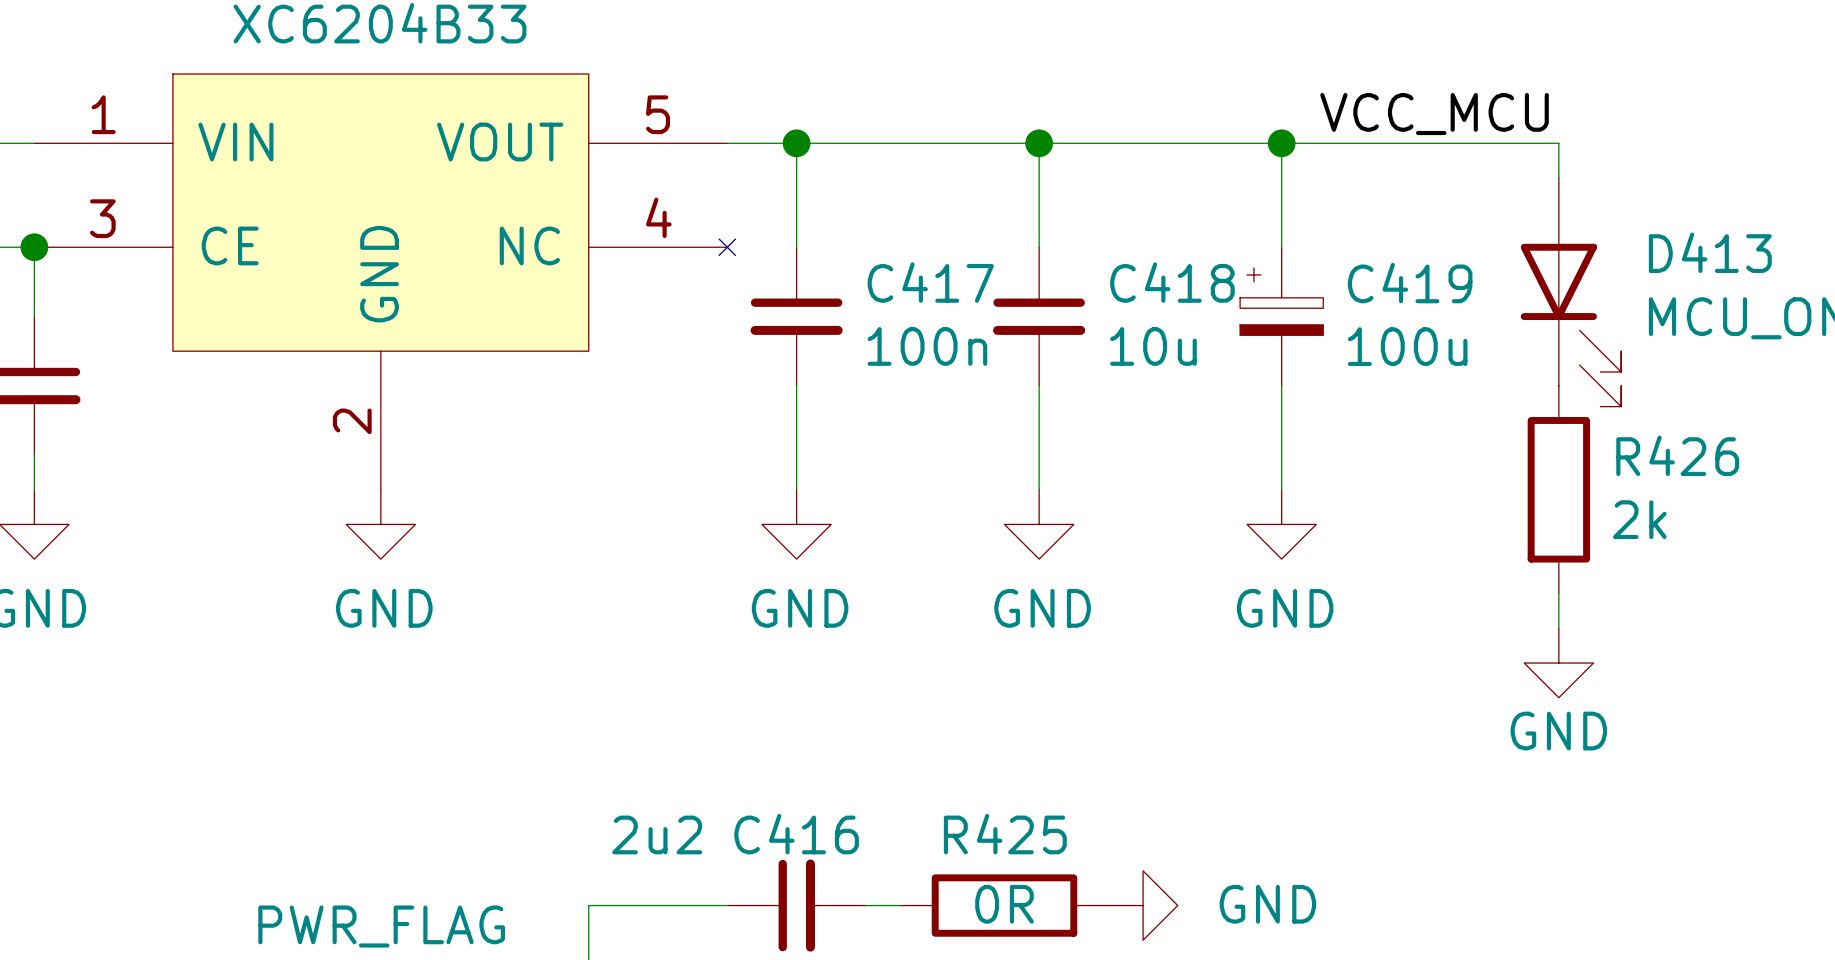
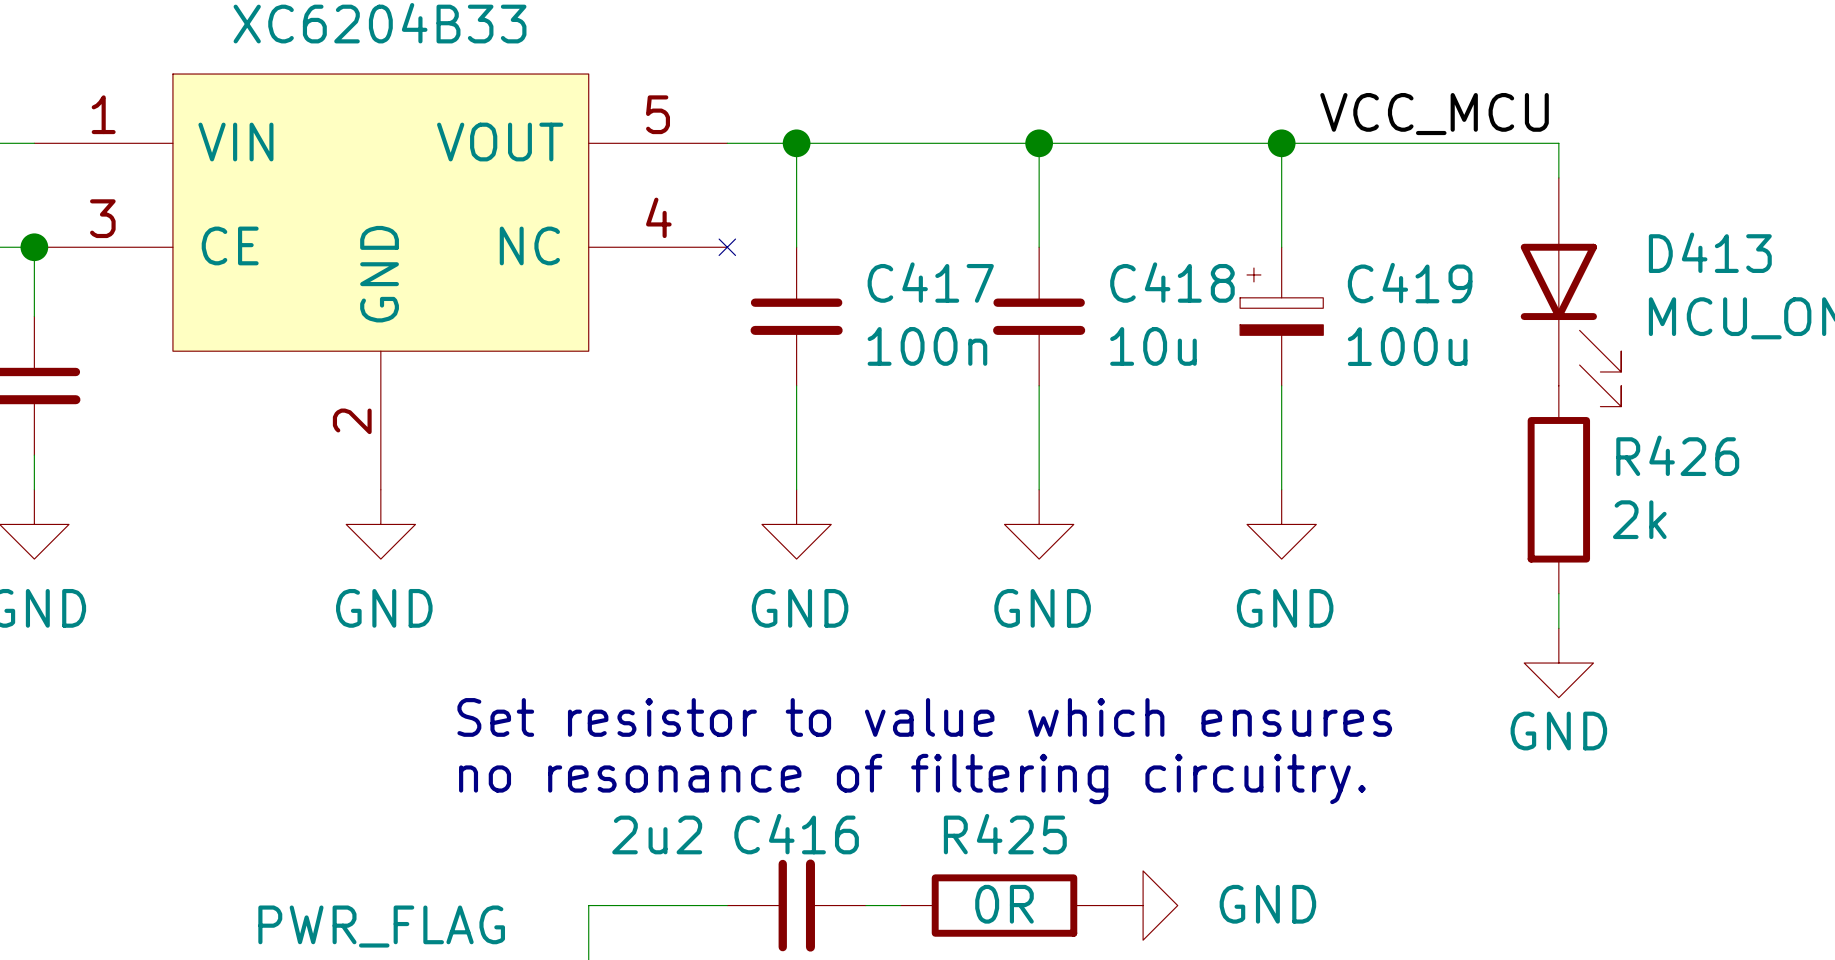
text: none -> Set resistor to value which ensures (924, 717)
text: none -> no resonance of filtering circuitry. (912, 779)

